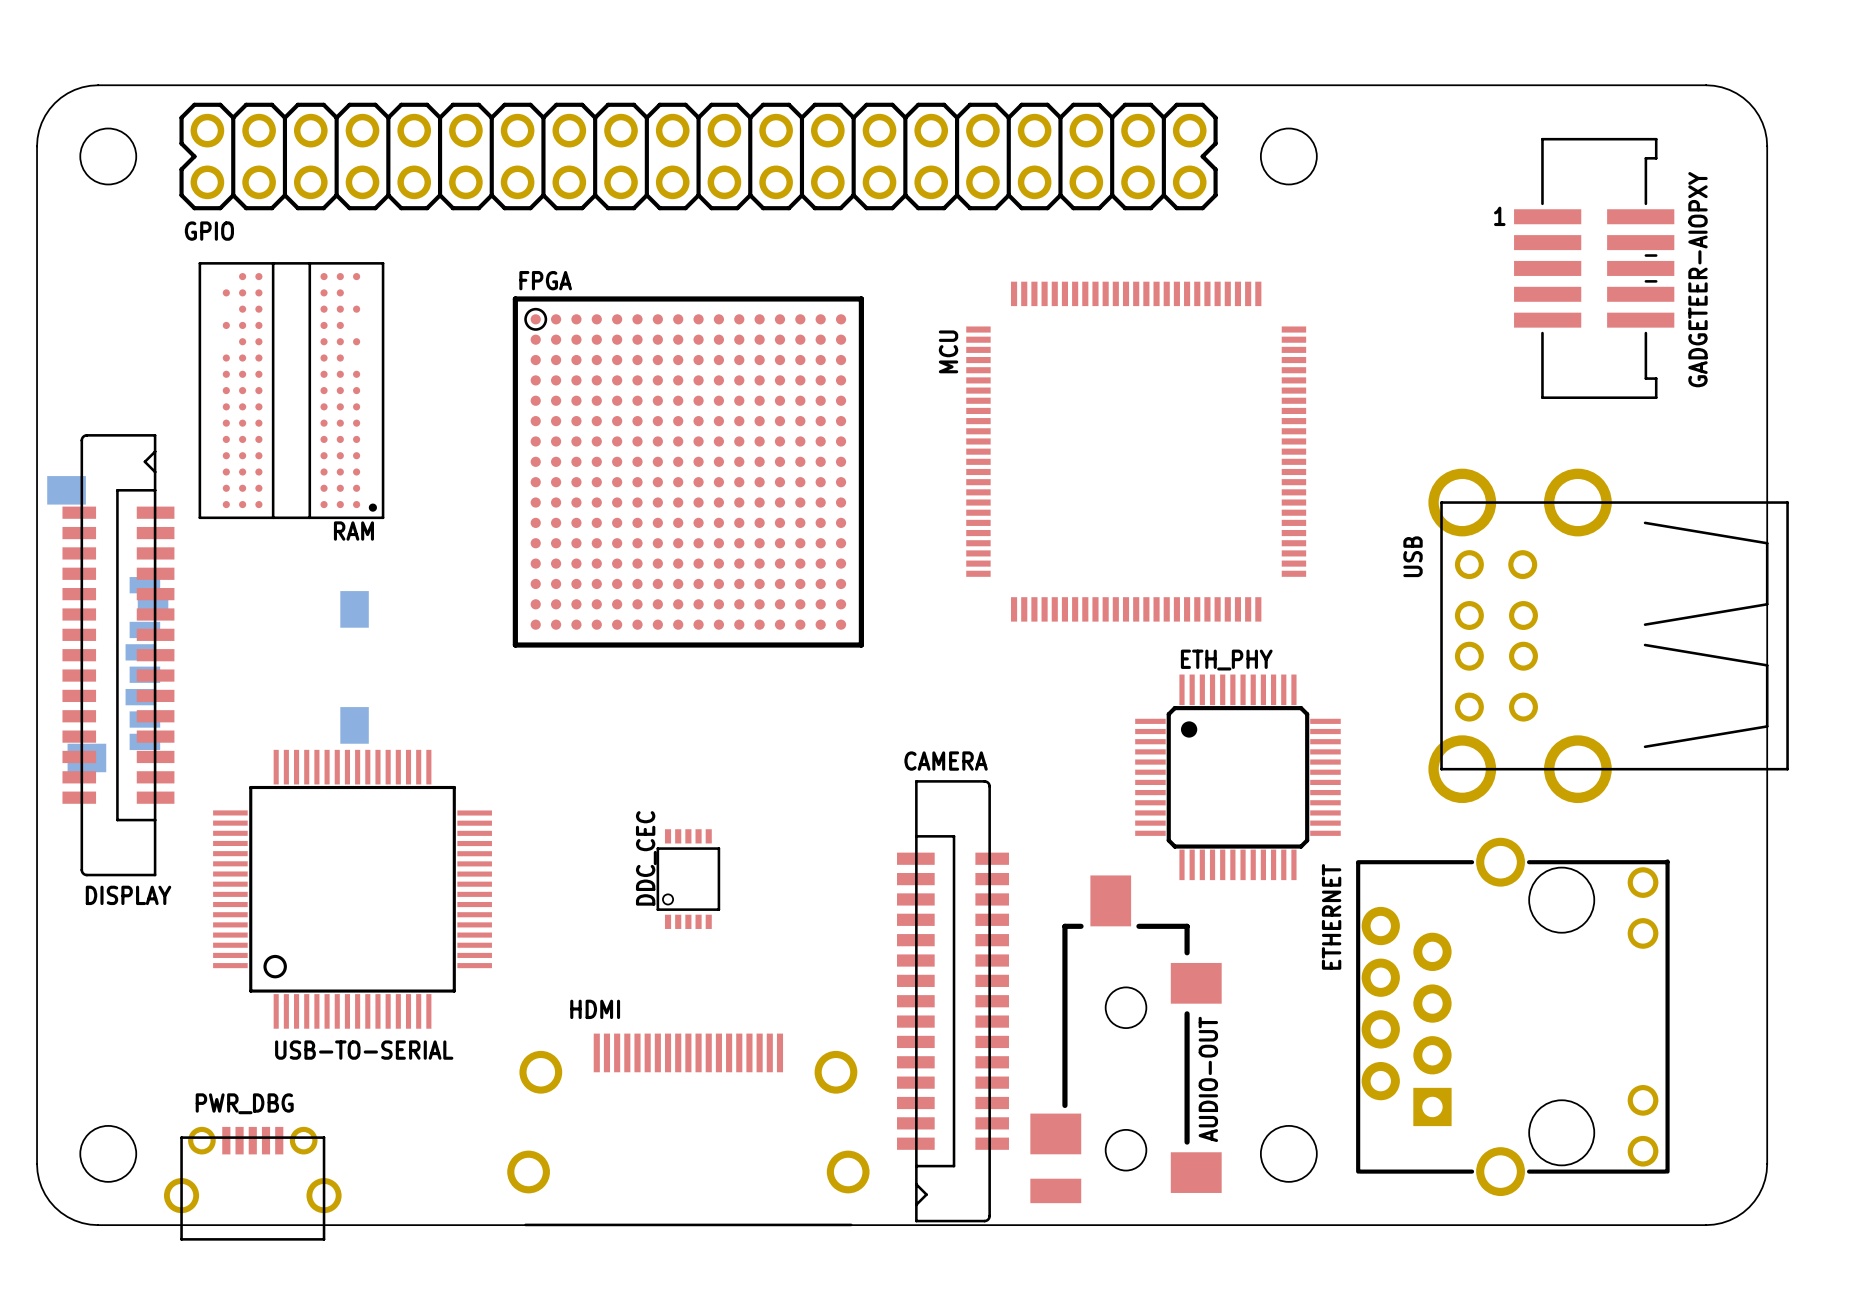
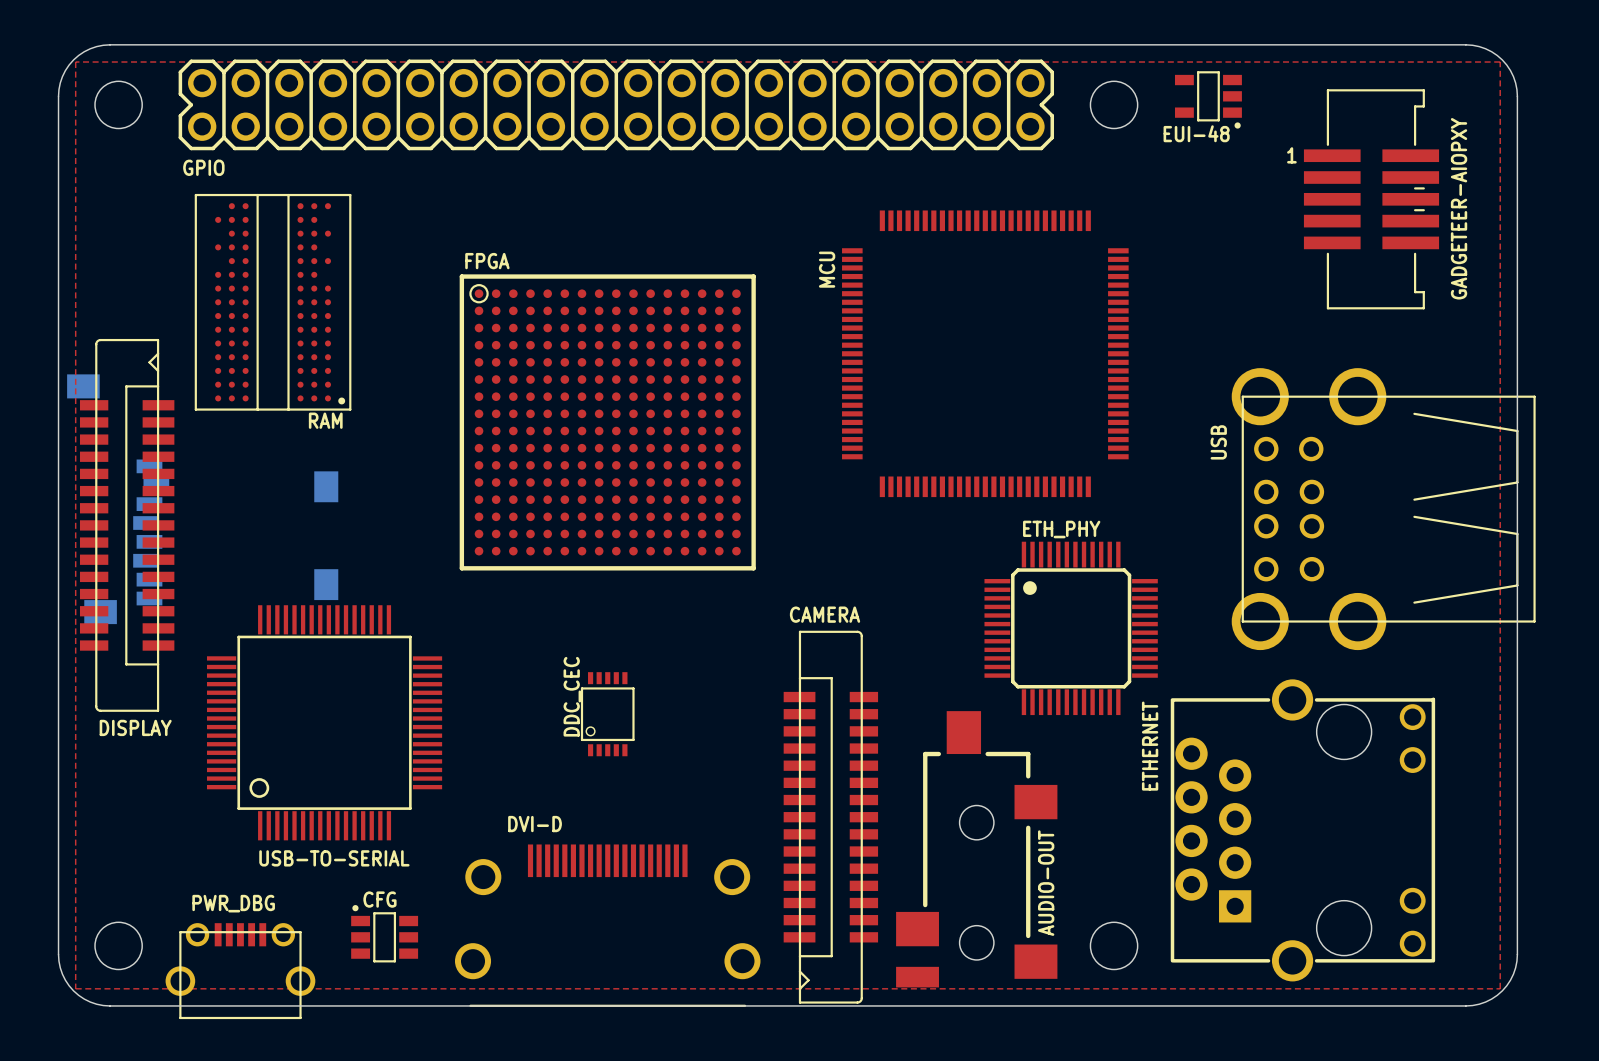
top zone outline: none -> (75, 62) (75, 988) (1500, 988) (1500, 62) (75, 62)
EUI-48: none -> (1208, 99)
FPGA position: (688, 472) -> (607, 422)
HDMI name: HDMI (595, 1009) -> DVI-D (535, 824)
CFG: none -> (384, 933)

